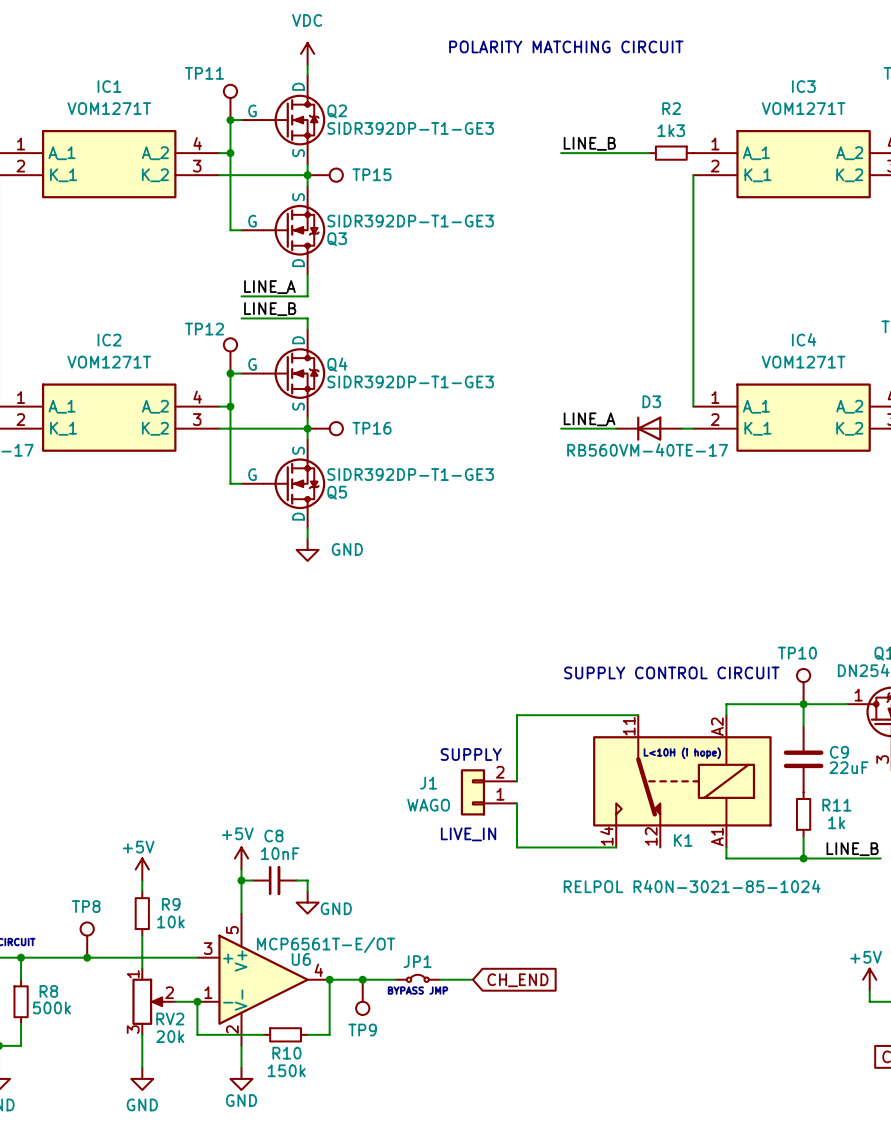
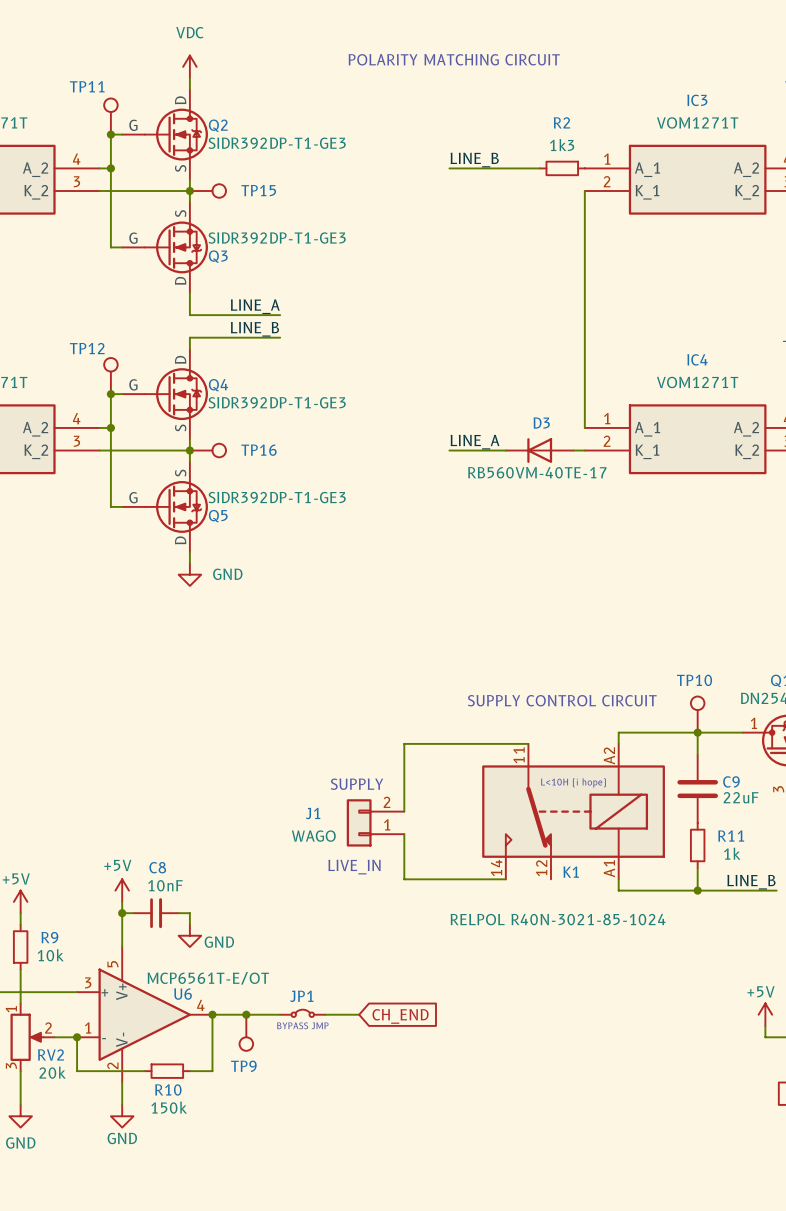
label position: LINE_A (269, 287) -> LINE_A (255, 306)
wire: (241, 296) (307, 296) -> (280, 315) (189, 315)
label position: LINE_B (270, 309) -> LINE_B (254, 329)
wire: (241, 318) (307, 318) -> (280, 337) (189, 337)

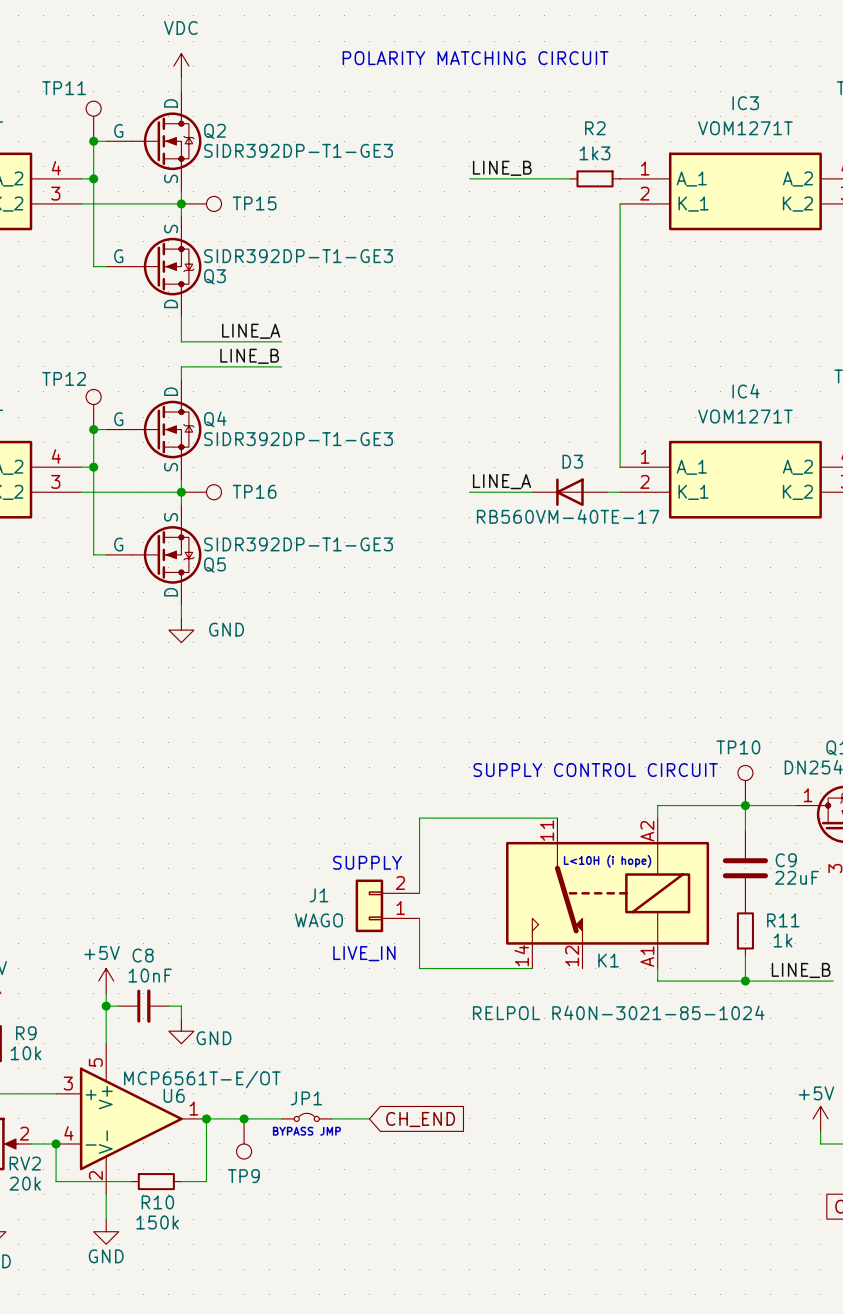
U6 pin number: 4 (200, 1005) -> 1 (193, 1108)
U6 pin number: 1 (88, 1027) -> 4 (68, 1133)

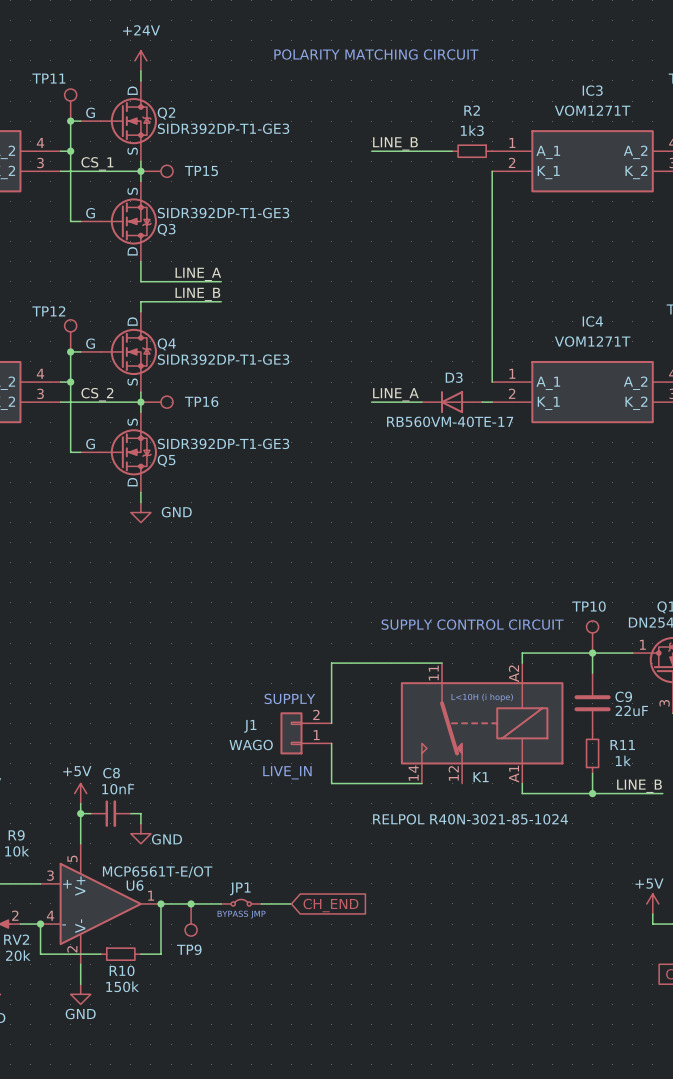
power symbol: VDC (181, 66) -> +24V (140, 60)
label: none -> CS_1 (97, 163)
label: none -> CS_2 (97, 394)

